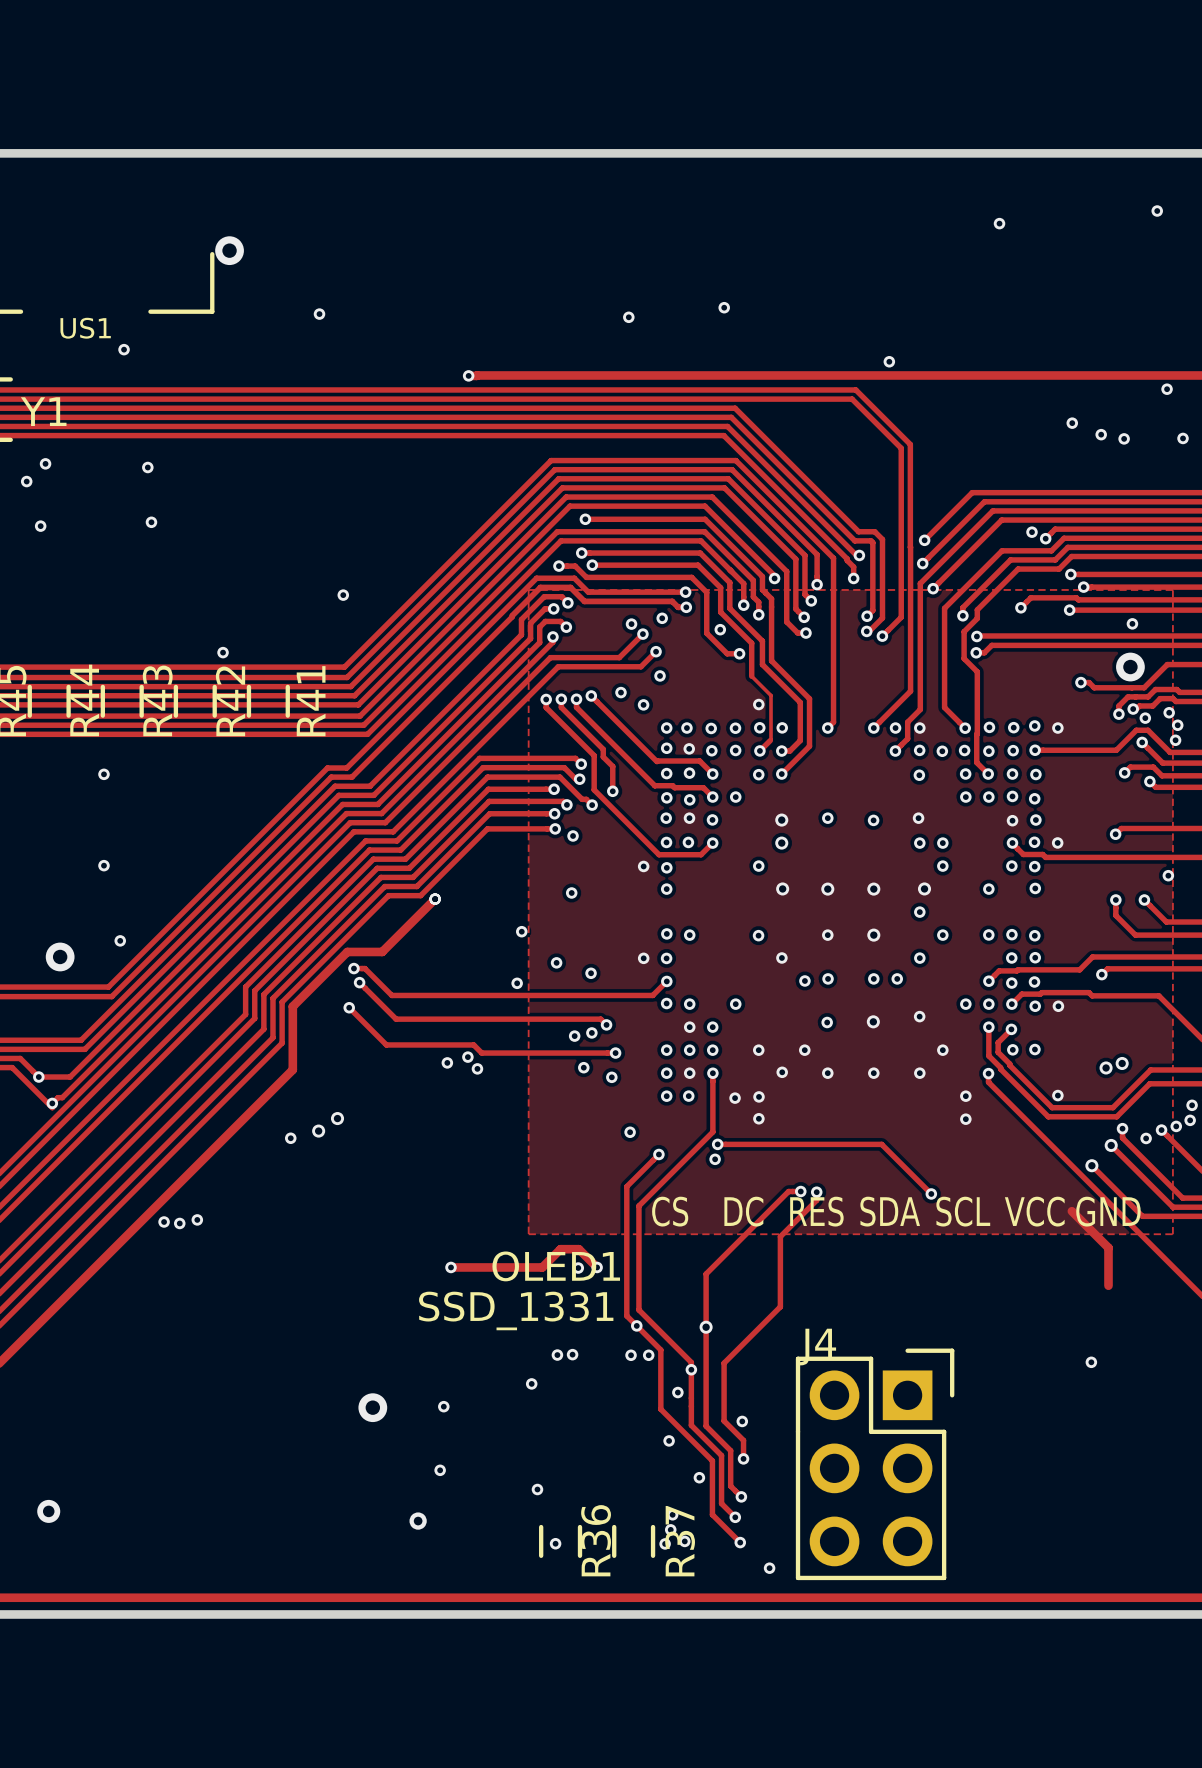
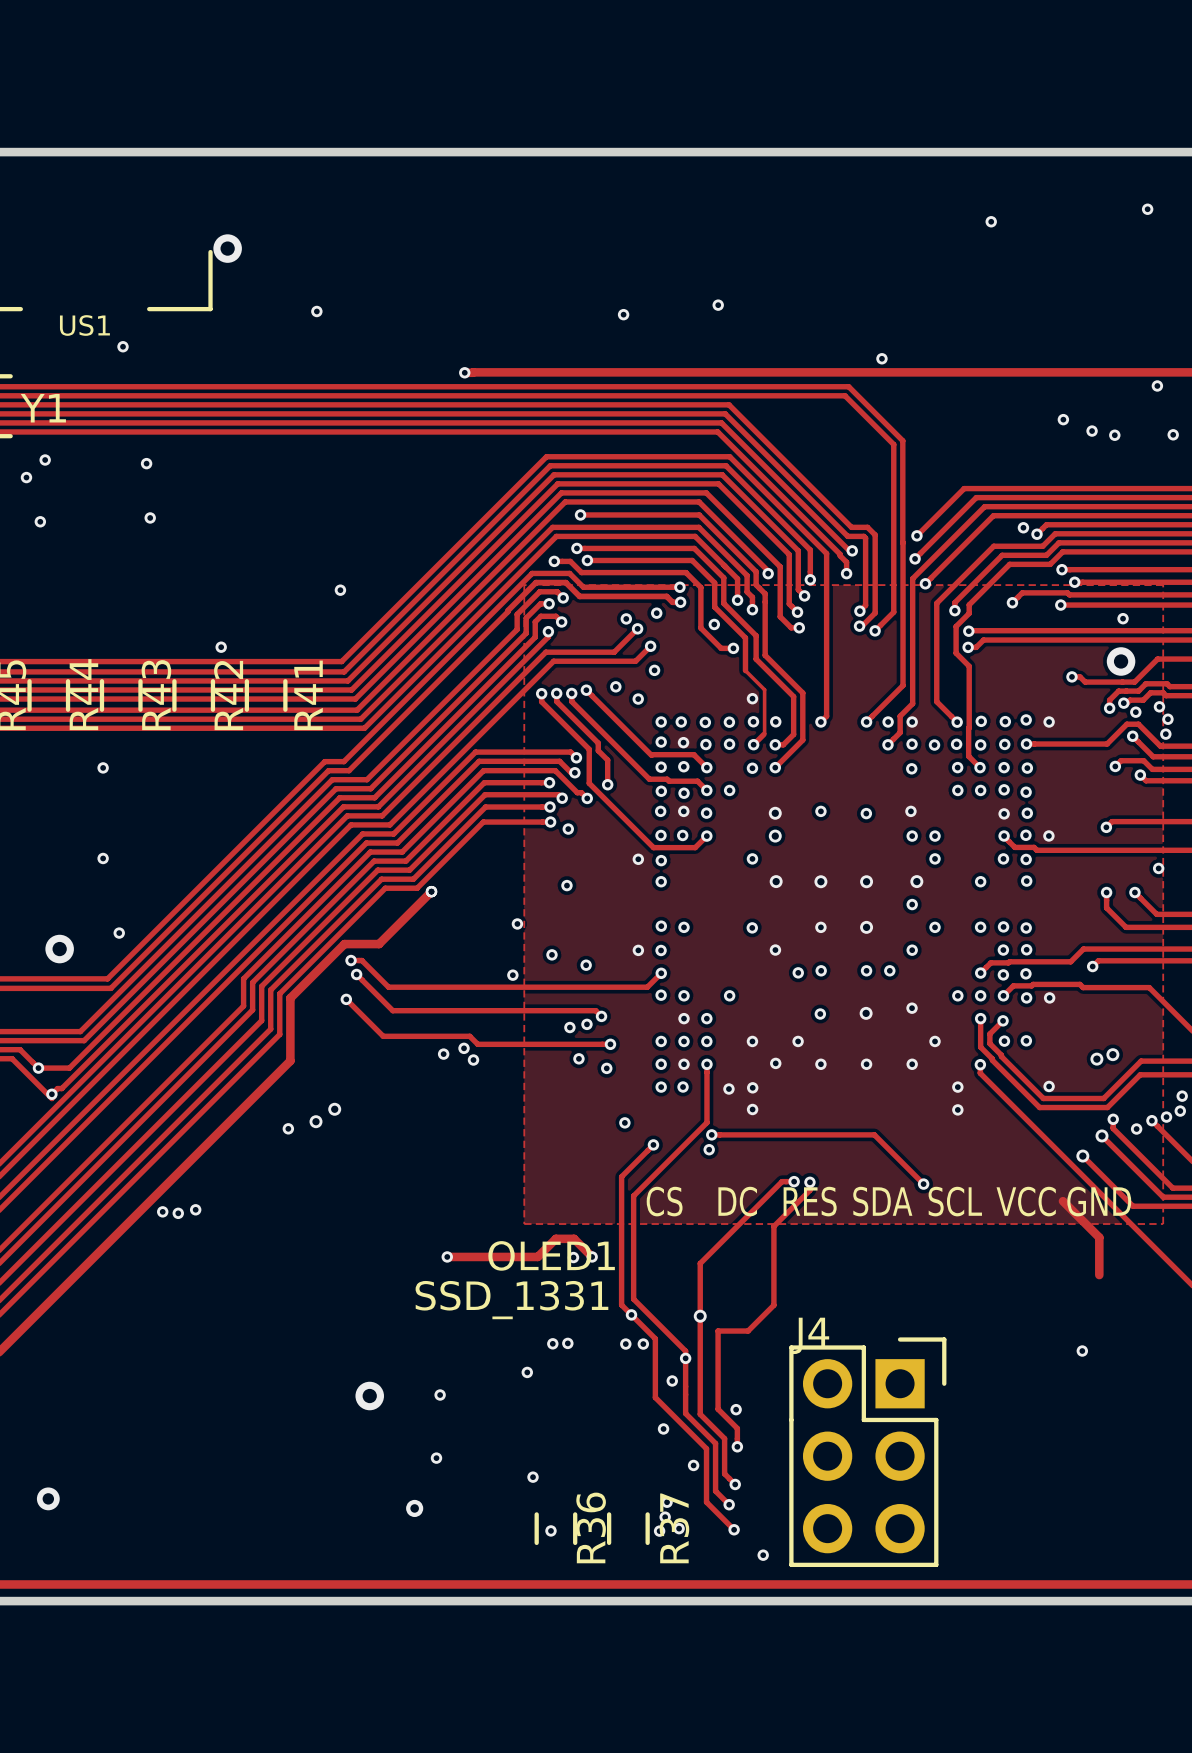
track: (780, 1306) (724, 1363) -> (773, 1296) (773, 1305) (748, 1331) (718, 1331) (718, 1351)

